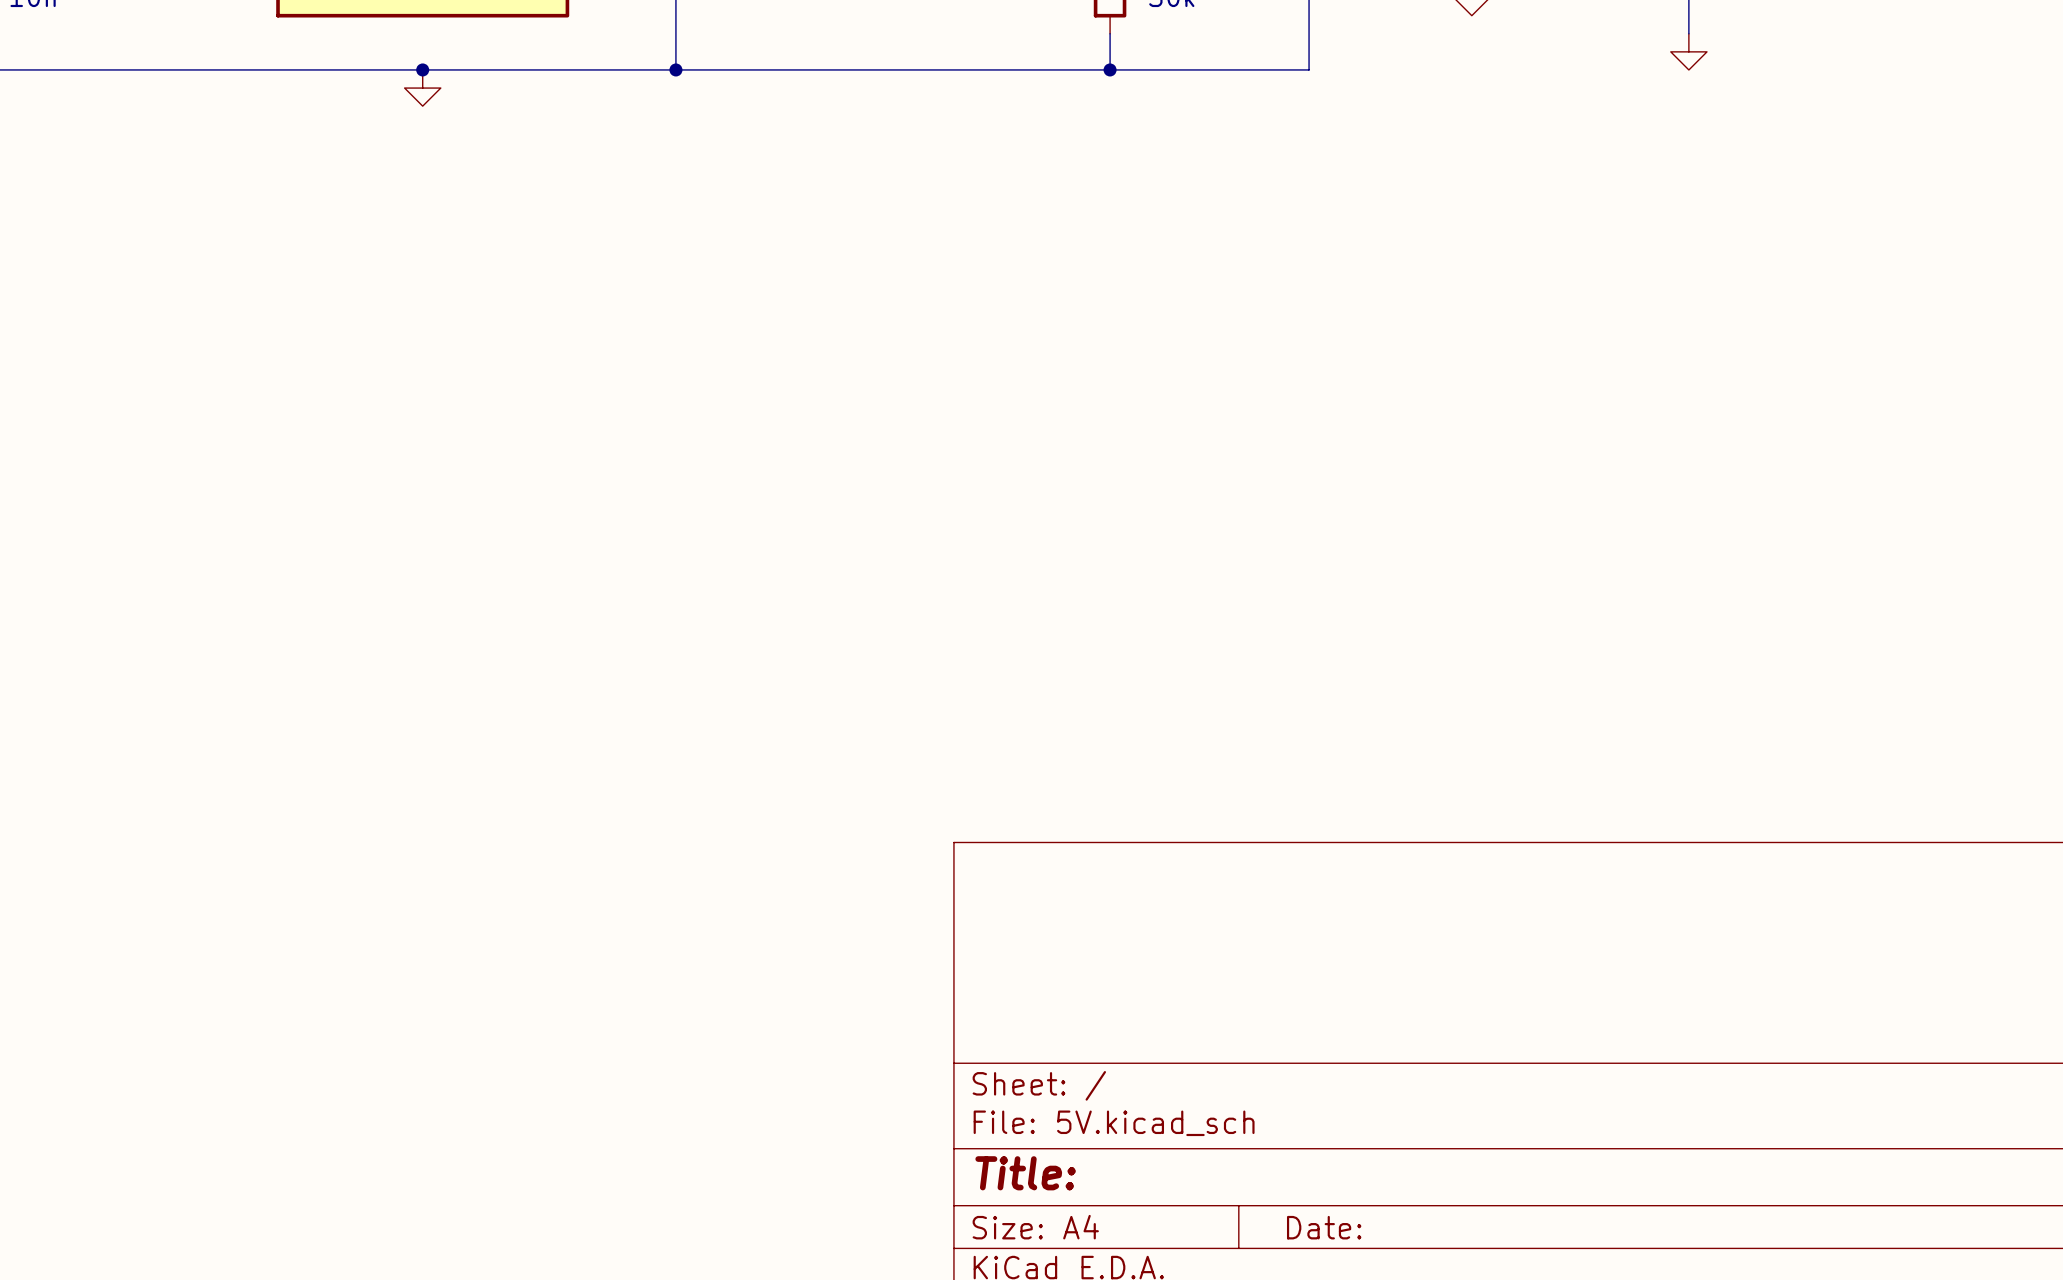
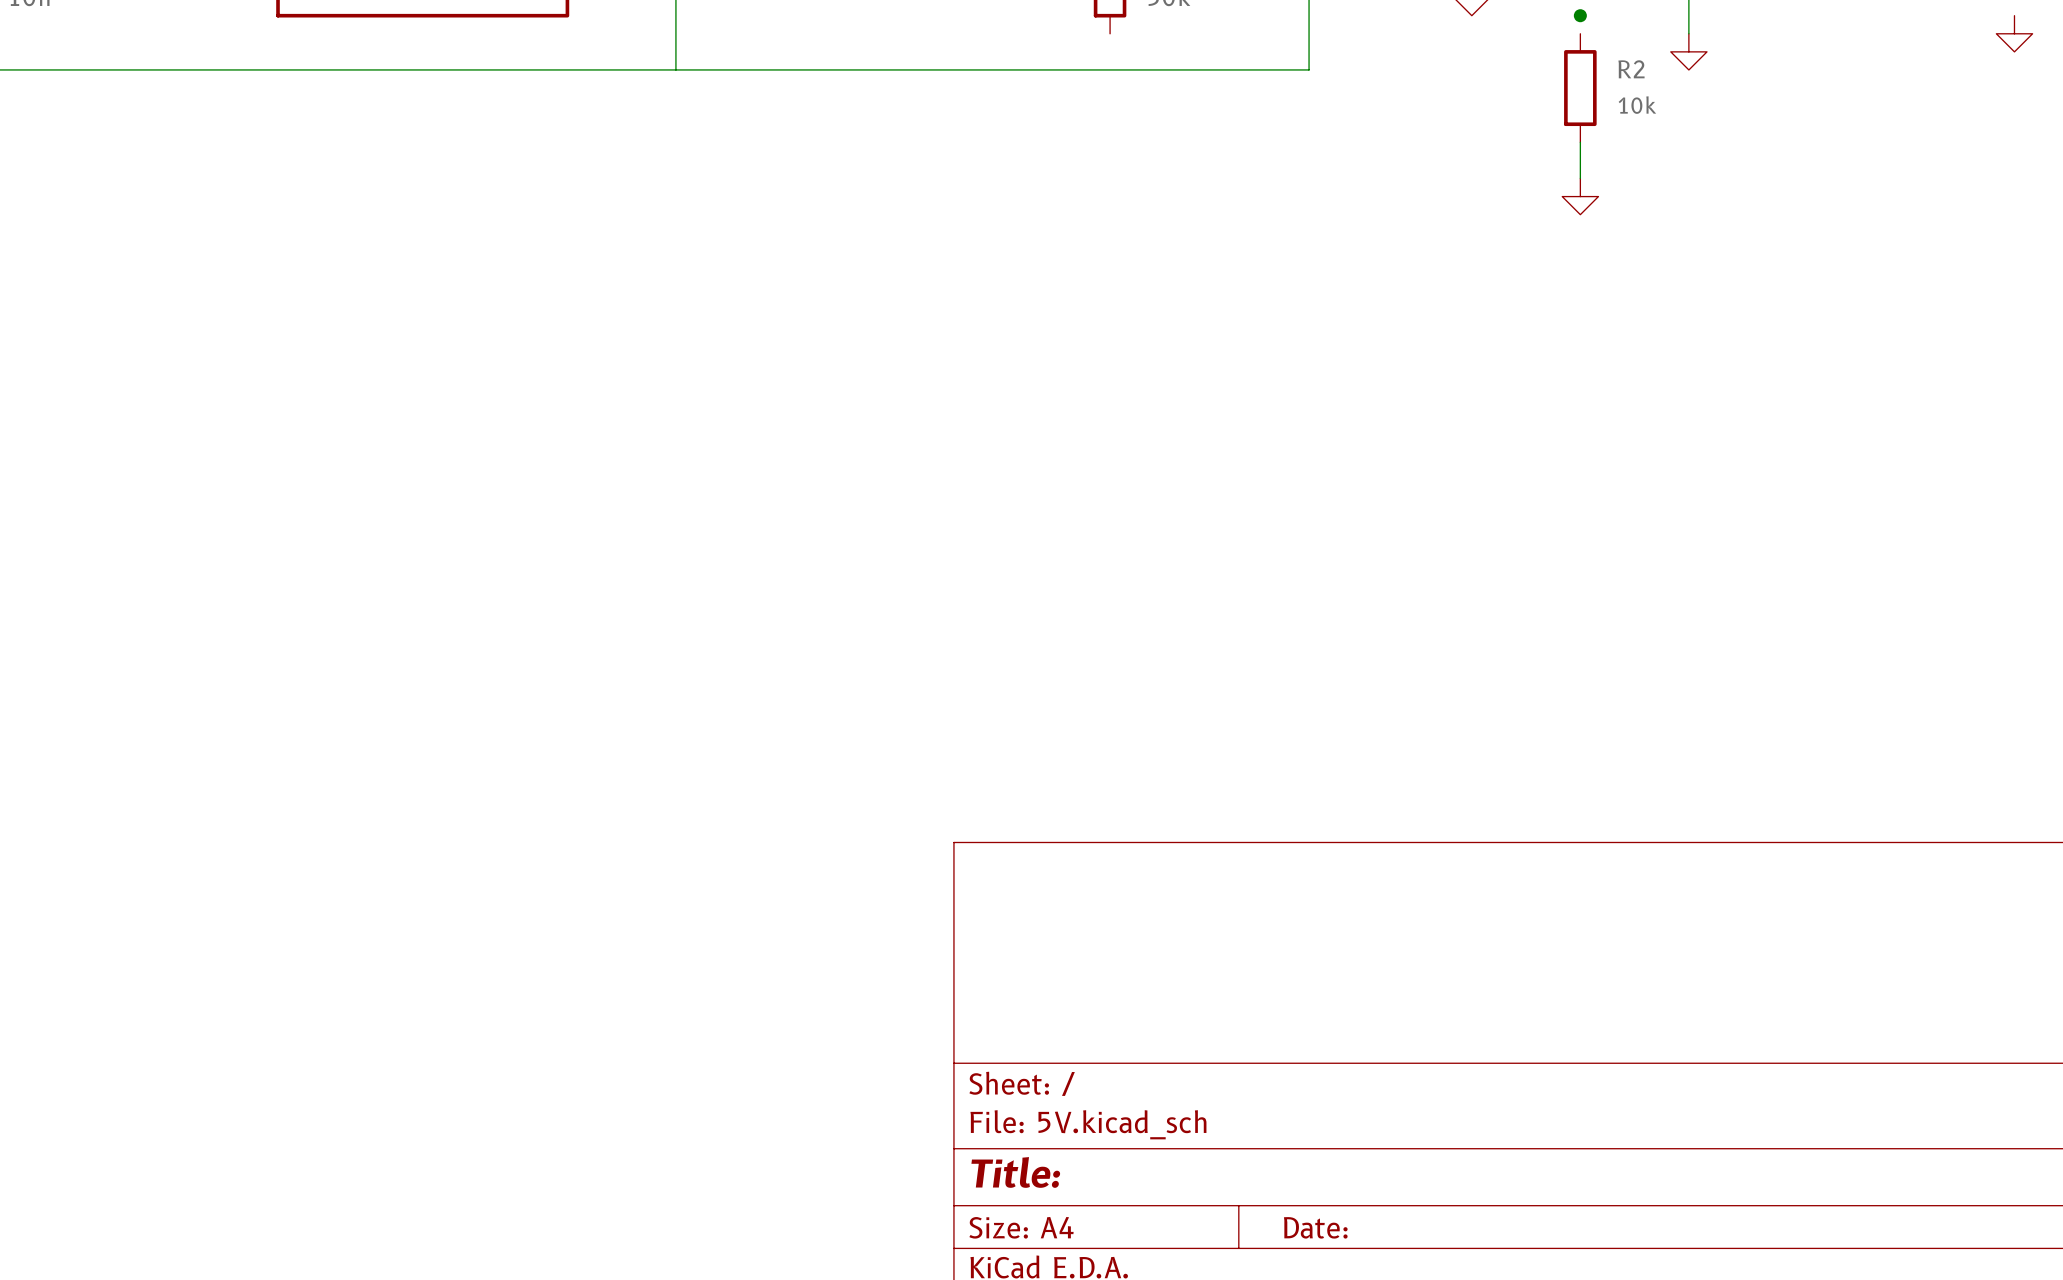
junction: none -> (1580, 15)
wire: (1110, 33) (1110, 69) -> none
power symbol: none -> (2014, 33)
junction: (422, 69) -> none
junction: (675, 69) -> none
junction: (1110, 69) -> none
power symbol: (422, 88) -> none
R2: none -> 10k (1580, 88)
wire: none -> (1580, 142) (1580, 178)
power symbol: none -> (1580, 196)

